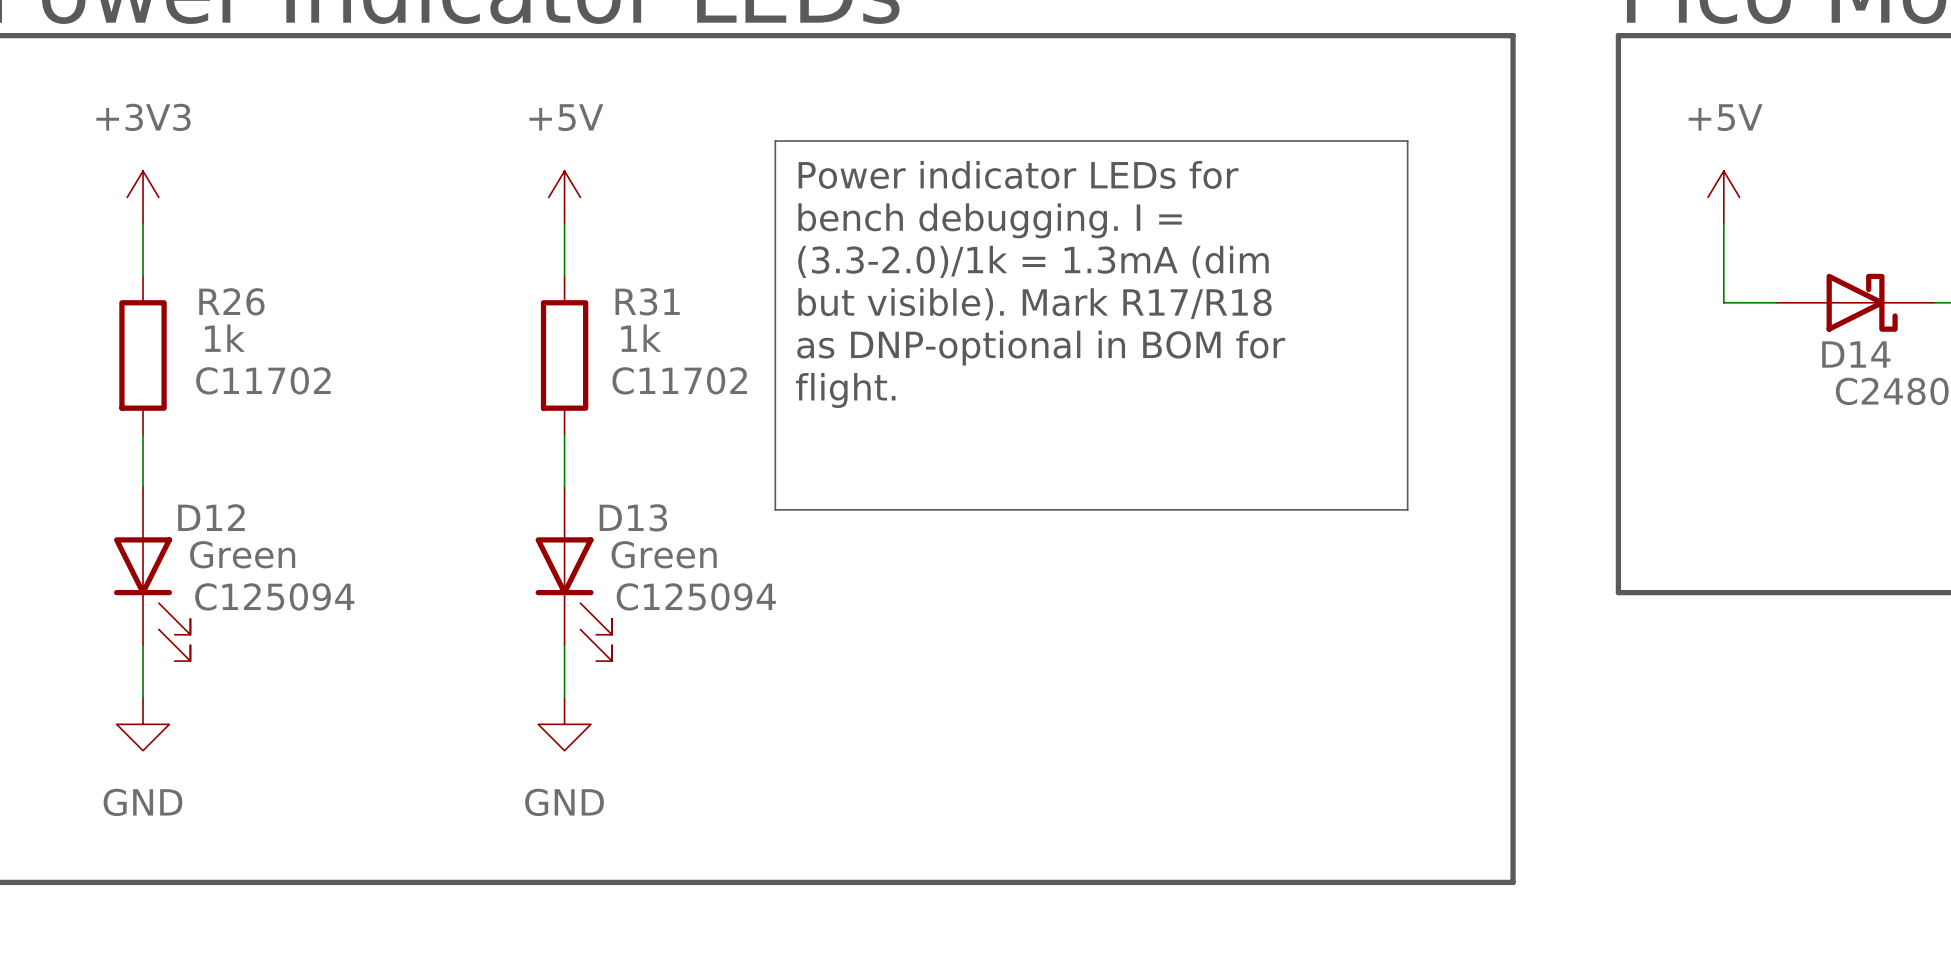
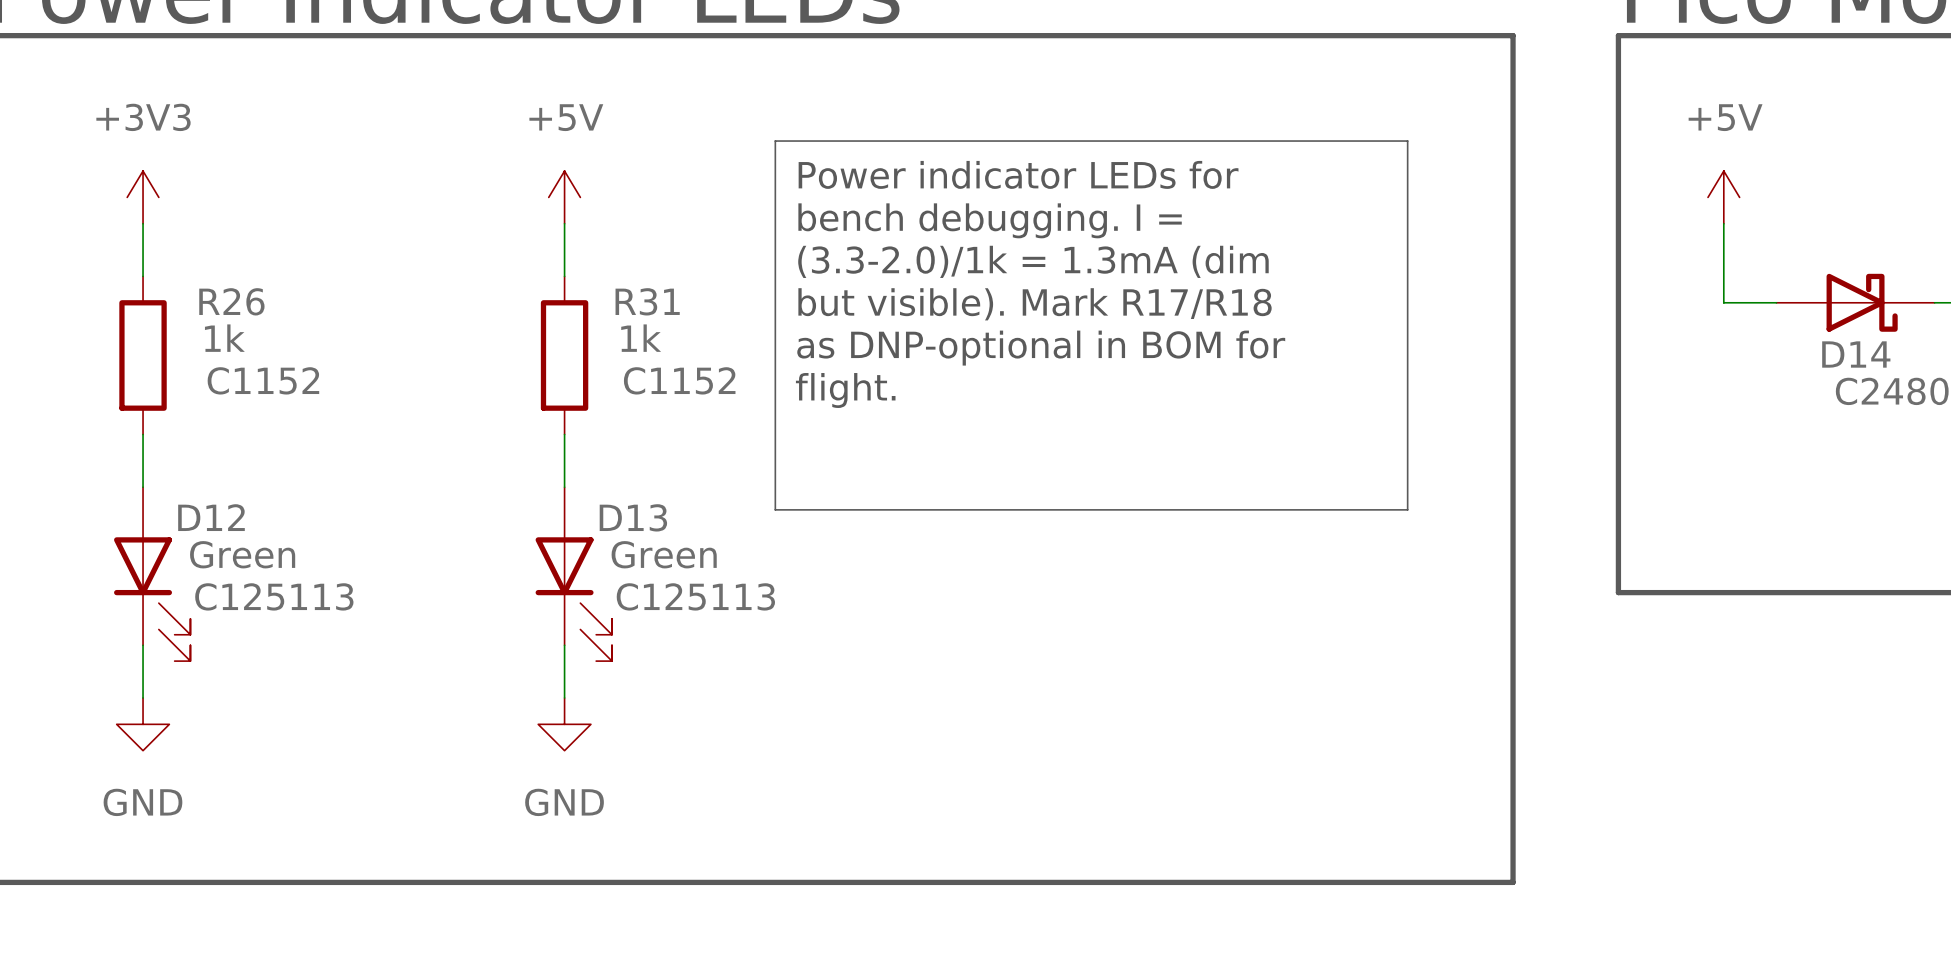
R26 text: C11702 (263, 380) -> C1152 (263, 380)
R31 text: C11702 (679, 380) -> C1152 (679, 380)
D12 text: C125094 (274, 596) -> C125113 (274, 596)
D13 text: C125094 (696, 596) -> C125113 (695, 596)

